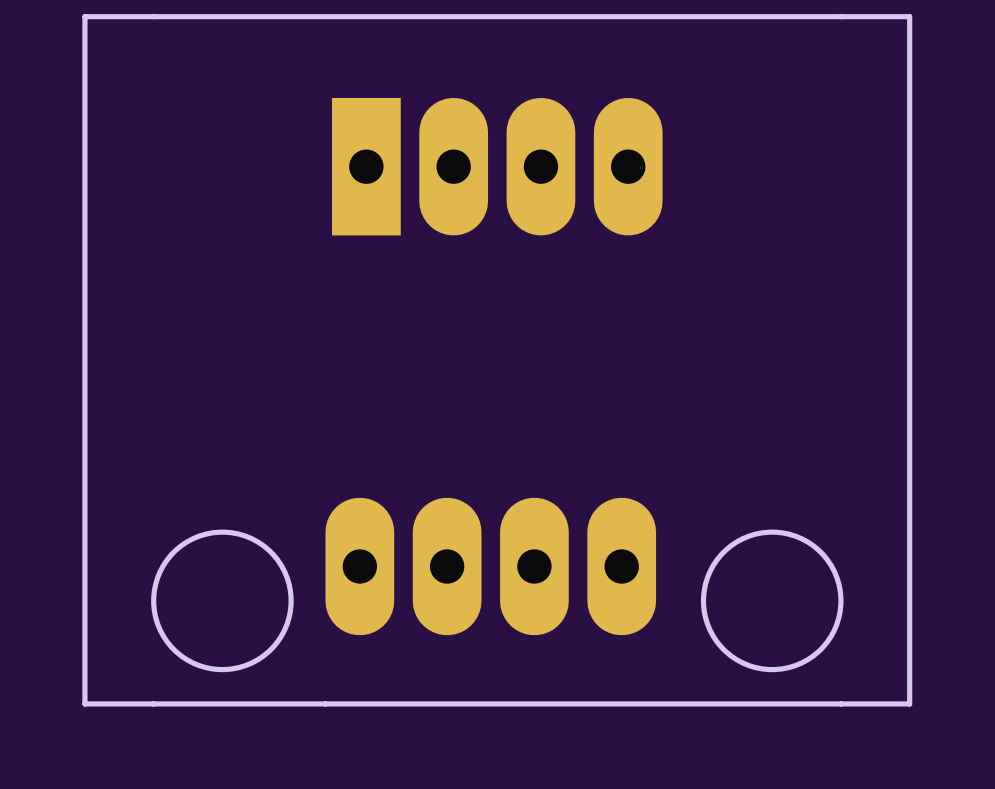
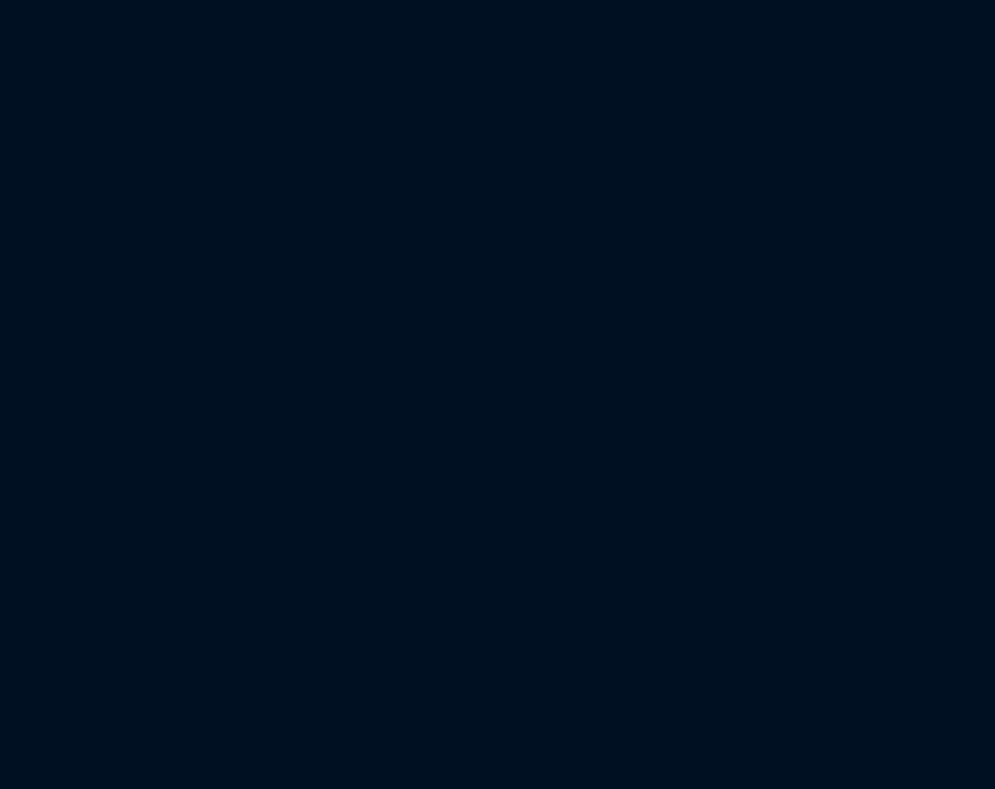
board edge: (909, 16) (84, 16) (84, 703) (909, 703) (909, 16) -> none
part: (497, 166) -> none
round board edge: [151, 529, 294, 673] -> none
round board edge: [700, 529, 844, 673] -> none
part: (490, 566) -> none

